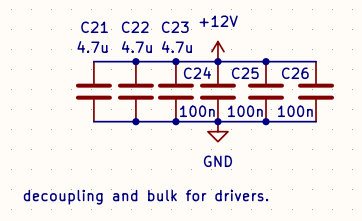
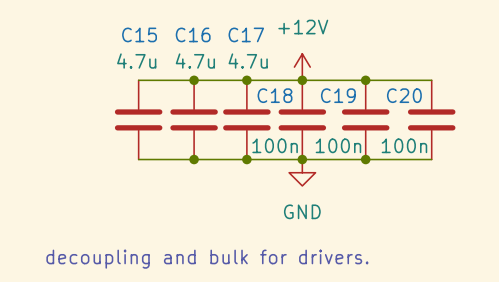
C21 name: C21 (94, 27) -> C15 (139, 34)
C22 name: C22 (135, 27) -> C16 (193, 34)
C23 name: C23 (175, 27) -> C17 (246, 34)
C24 name: C24 (197, 73) -> C18 (275, 95)
C25 name: C25 (245, 73) -> C19 (338, 95)
C26 name: C26 (295, 73) -> C20 (404, 95)

